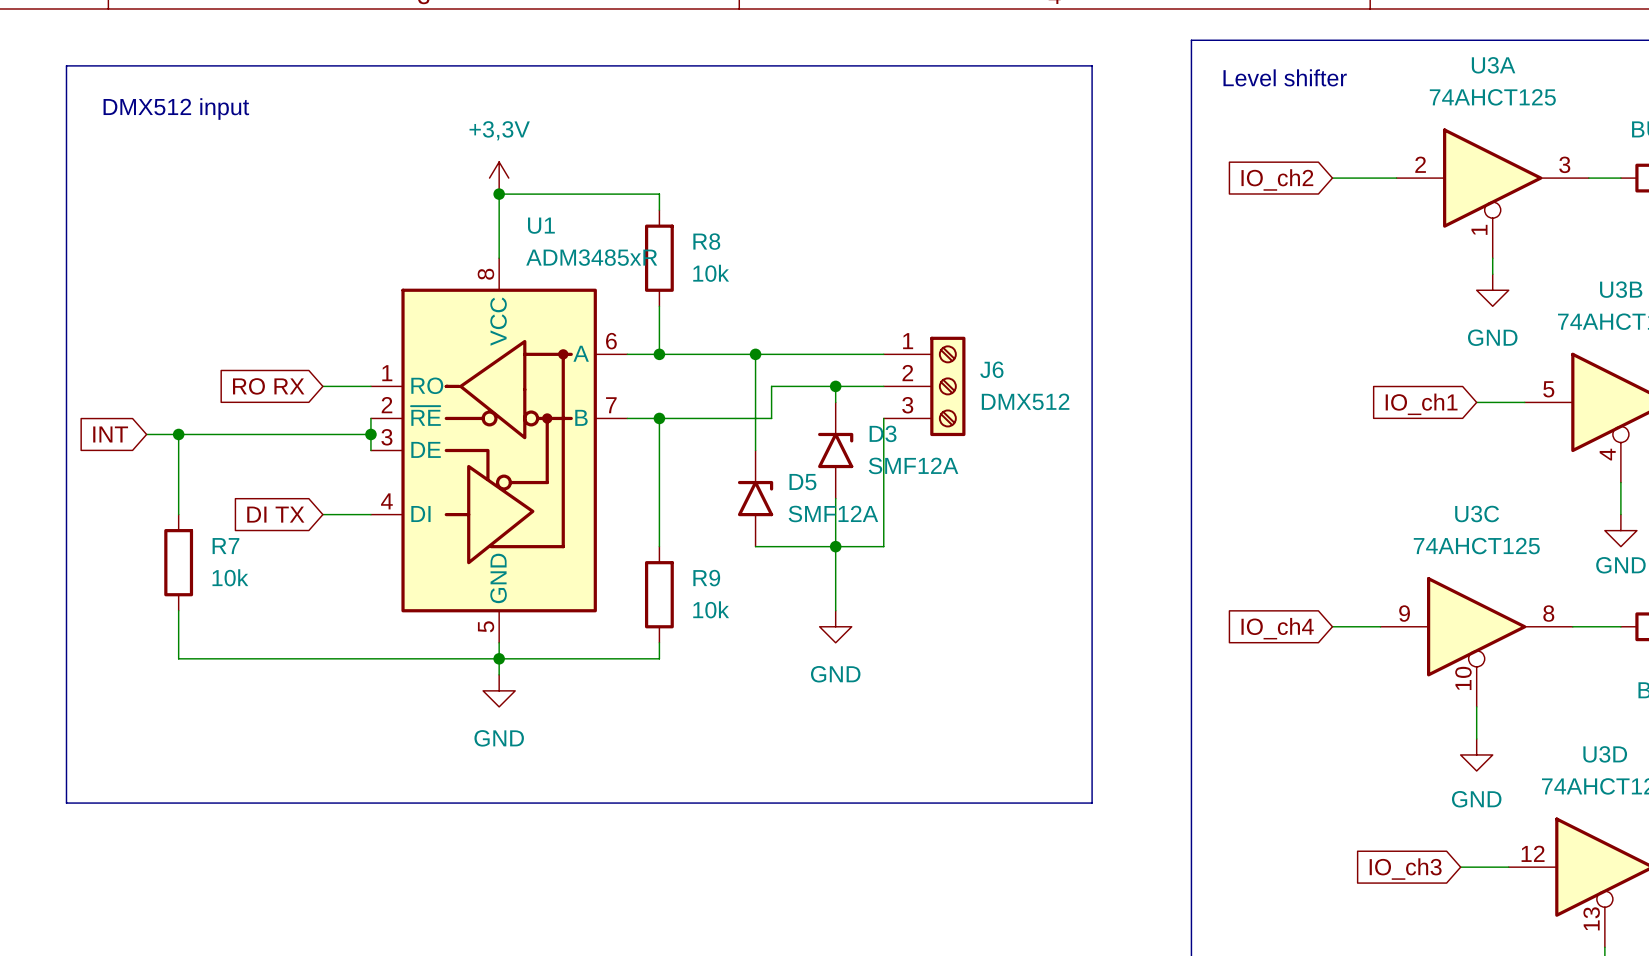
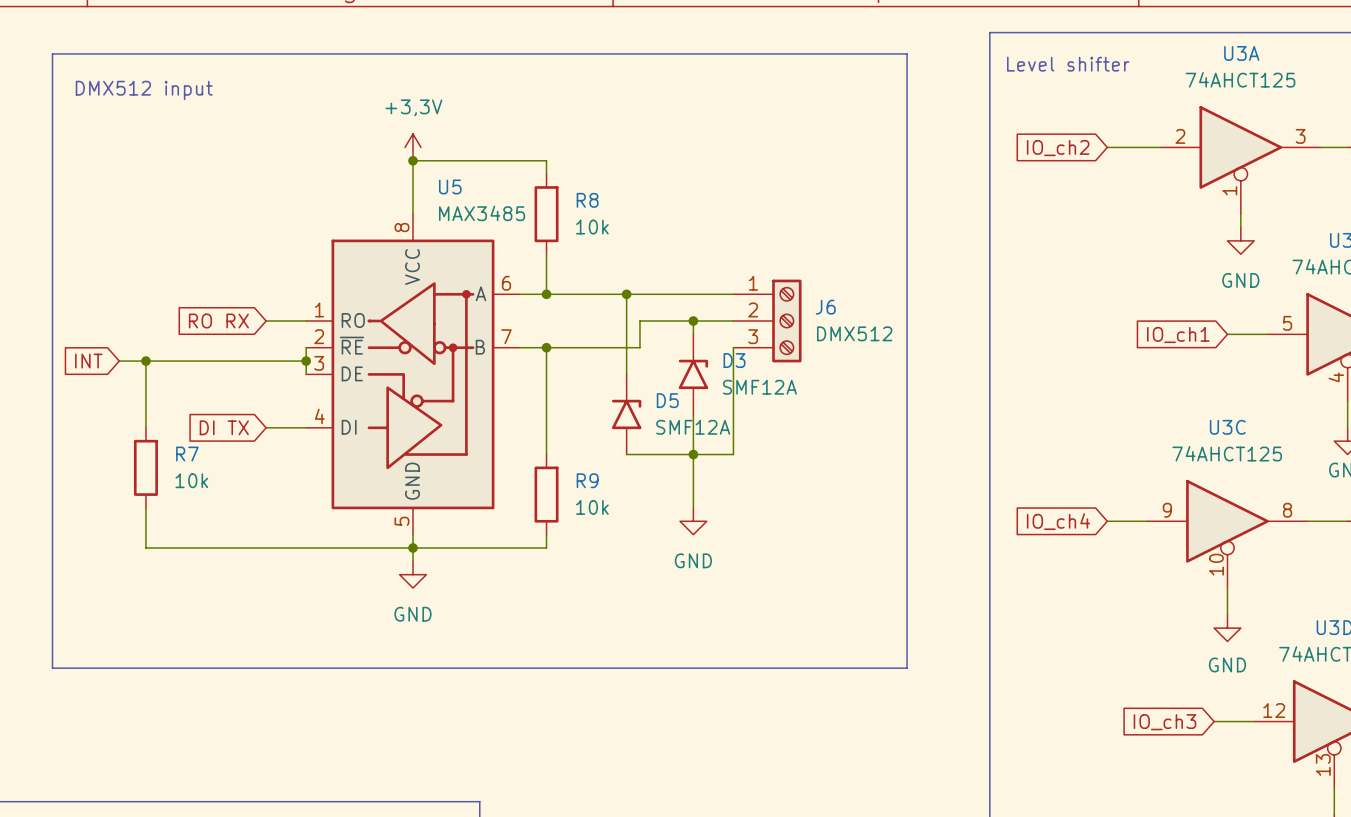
U1 name: U1 (541, 225) -> U5 (450, 186)
U1 value: ADM3485xR (591, 257) -> MAX3485 (482, 213)

